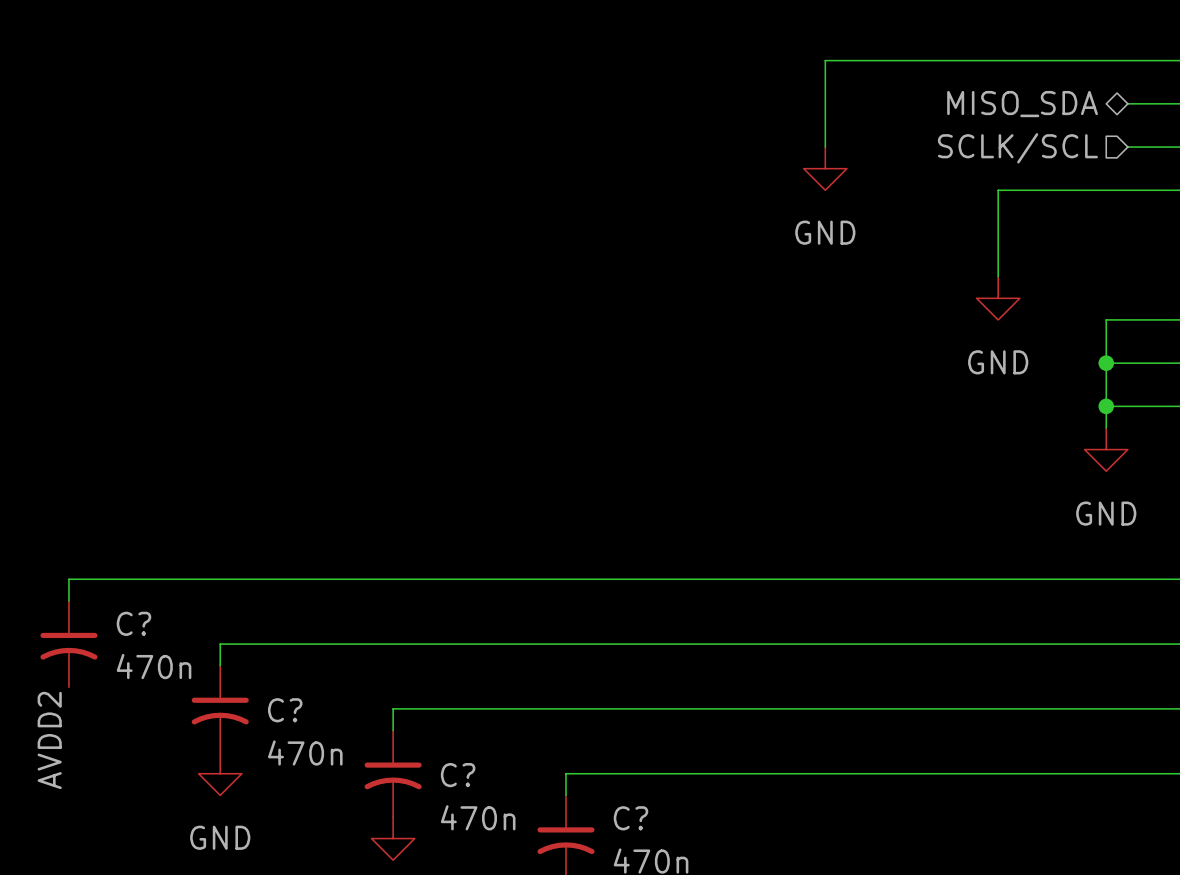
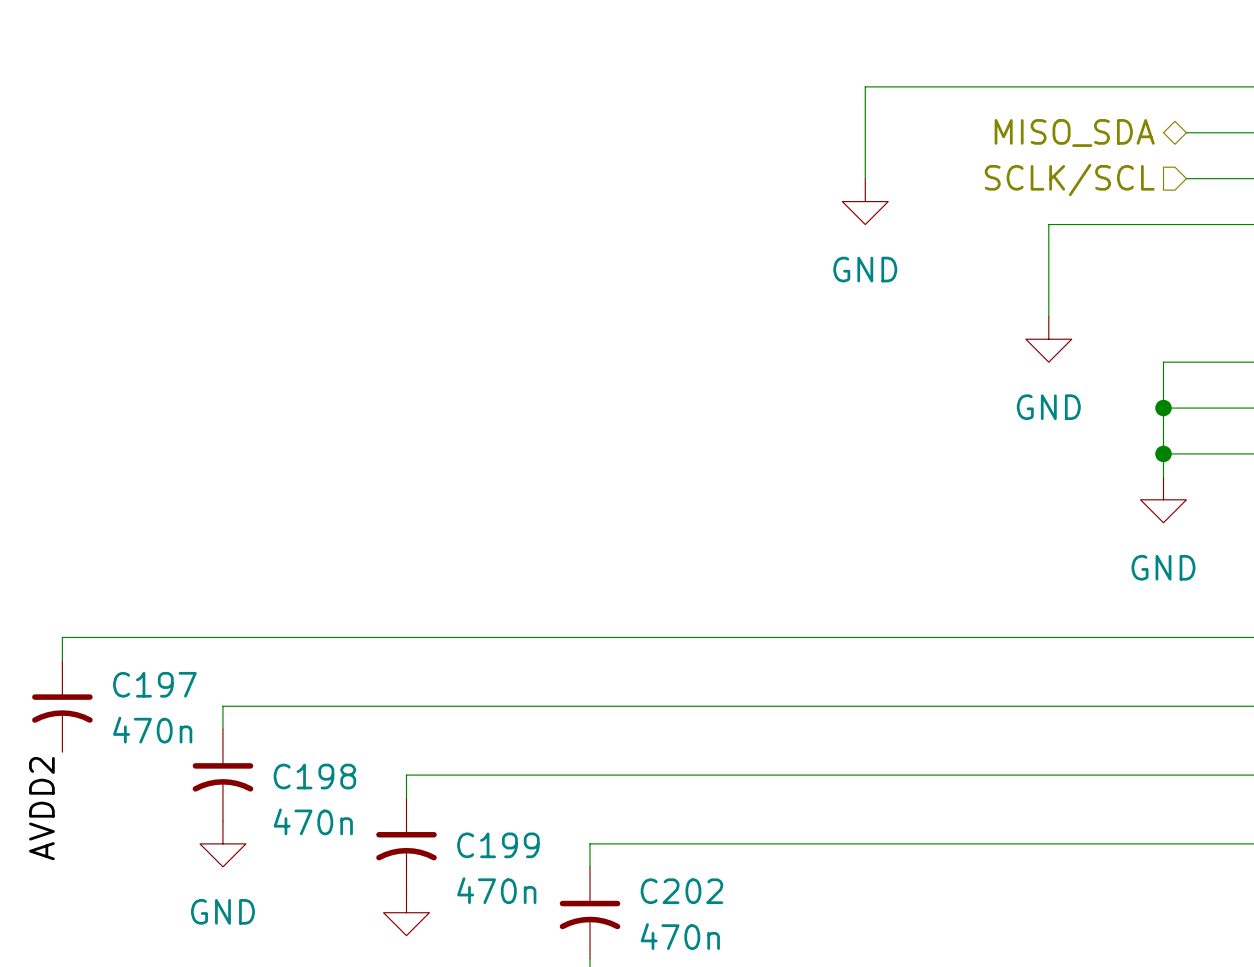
C? name: C? (133, 623) -> C197 (154, 684)
C? name: C? (285, 710) -> C198 (314, 776)
C? name: C? (458, 775) -> C199 (498, 845)
C? name: C? (630, 818) -> C202 (681, 891)

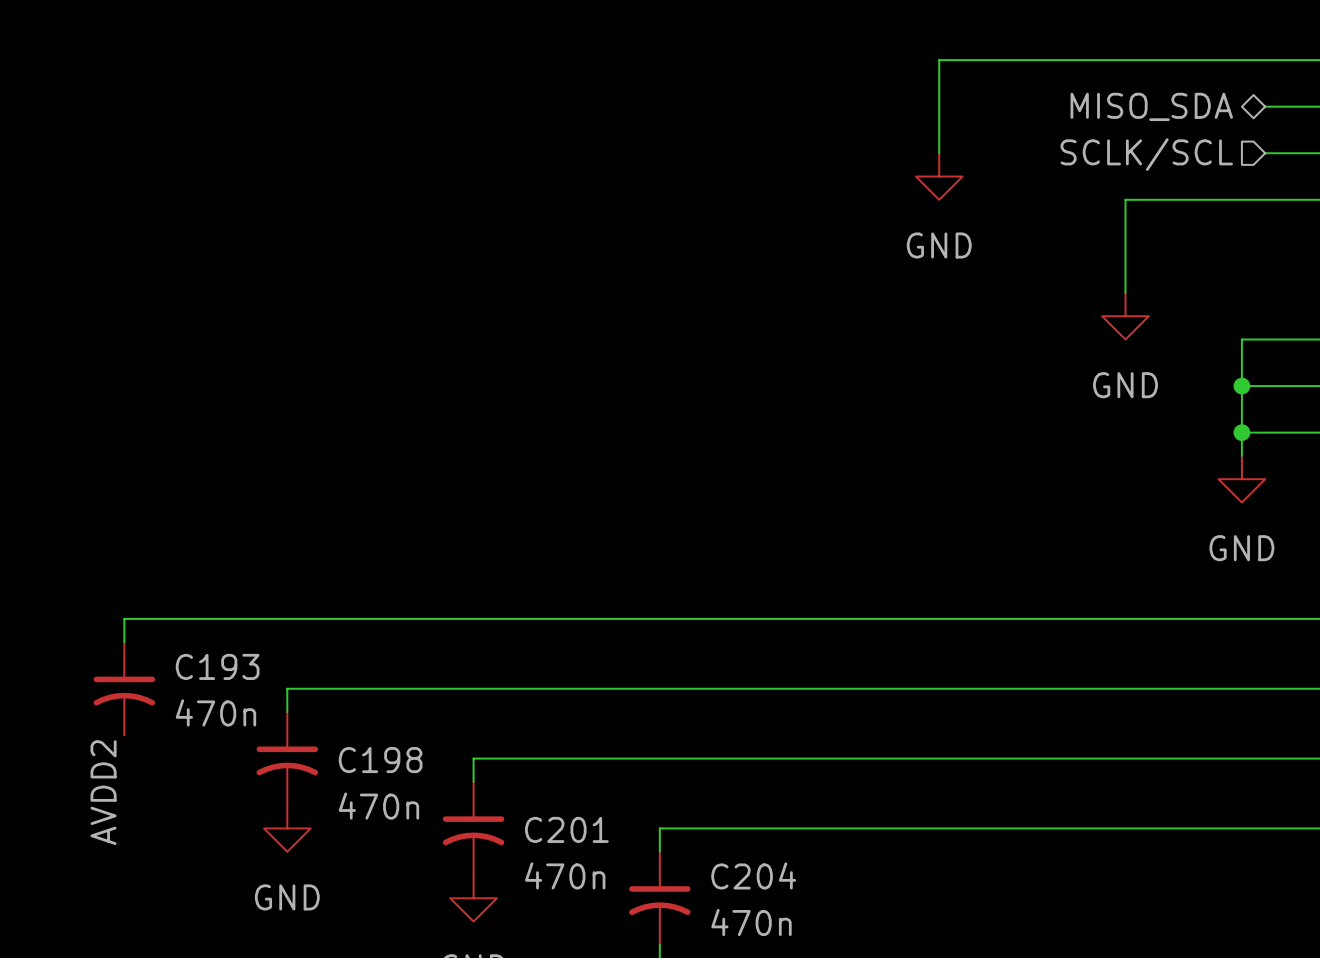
C197 name: C197 (154, 684) -> C193 (217, 666)
C199 name: C199 (498, 845) -> C201 (566, 829)
C202 name: C202 (681, 891) -> C204 (753, 875)

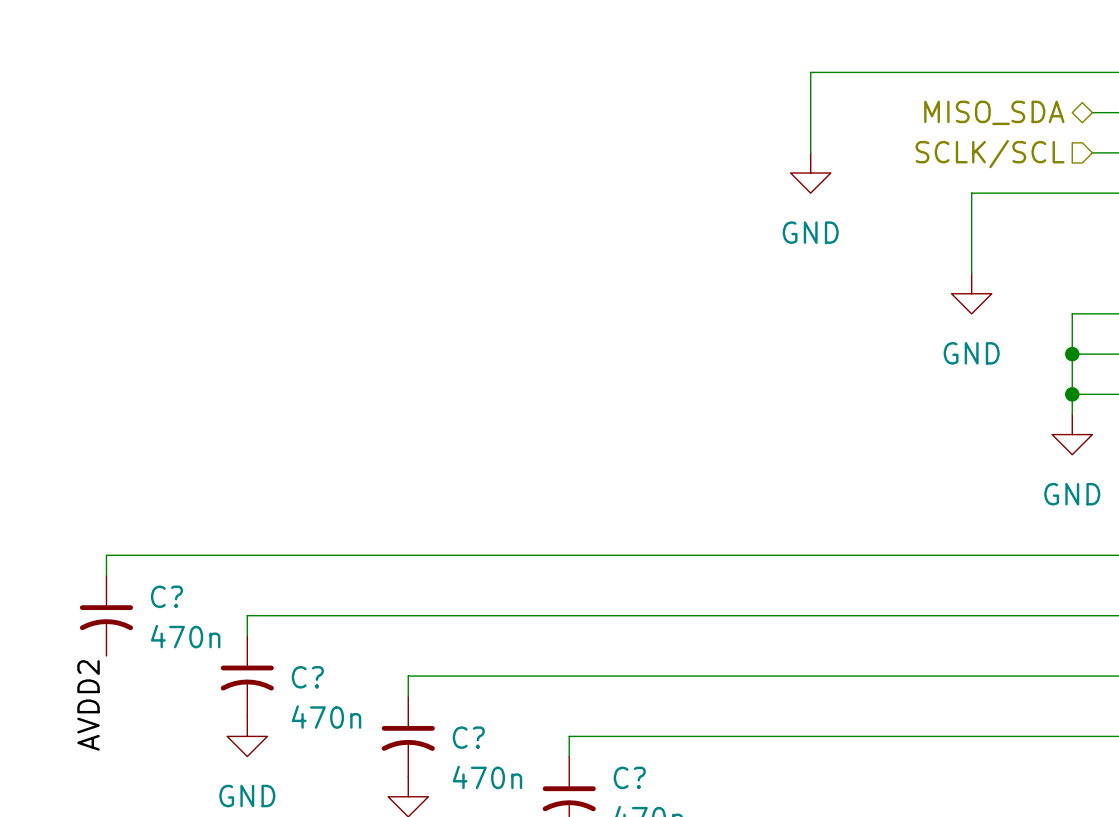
C193 name: C193 (217, 666) -> C? (166, 596)
C198 name: C198 (380, 760) -> C? (307, 677)
C201 name: C201 (566, 829) -> C? (468, 737)
C204 name: C204 (753, 875) -> C? (629, 777)

